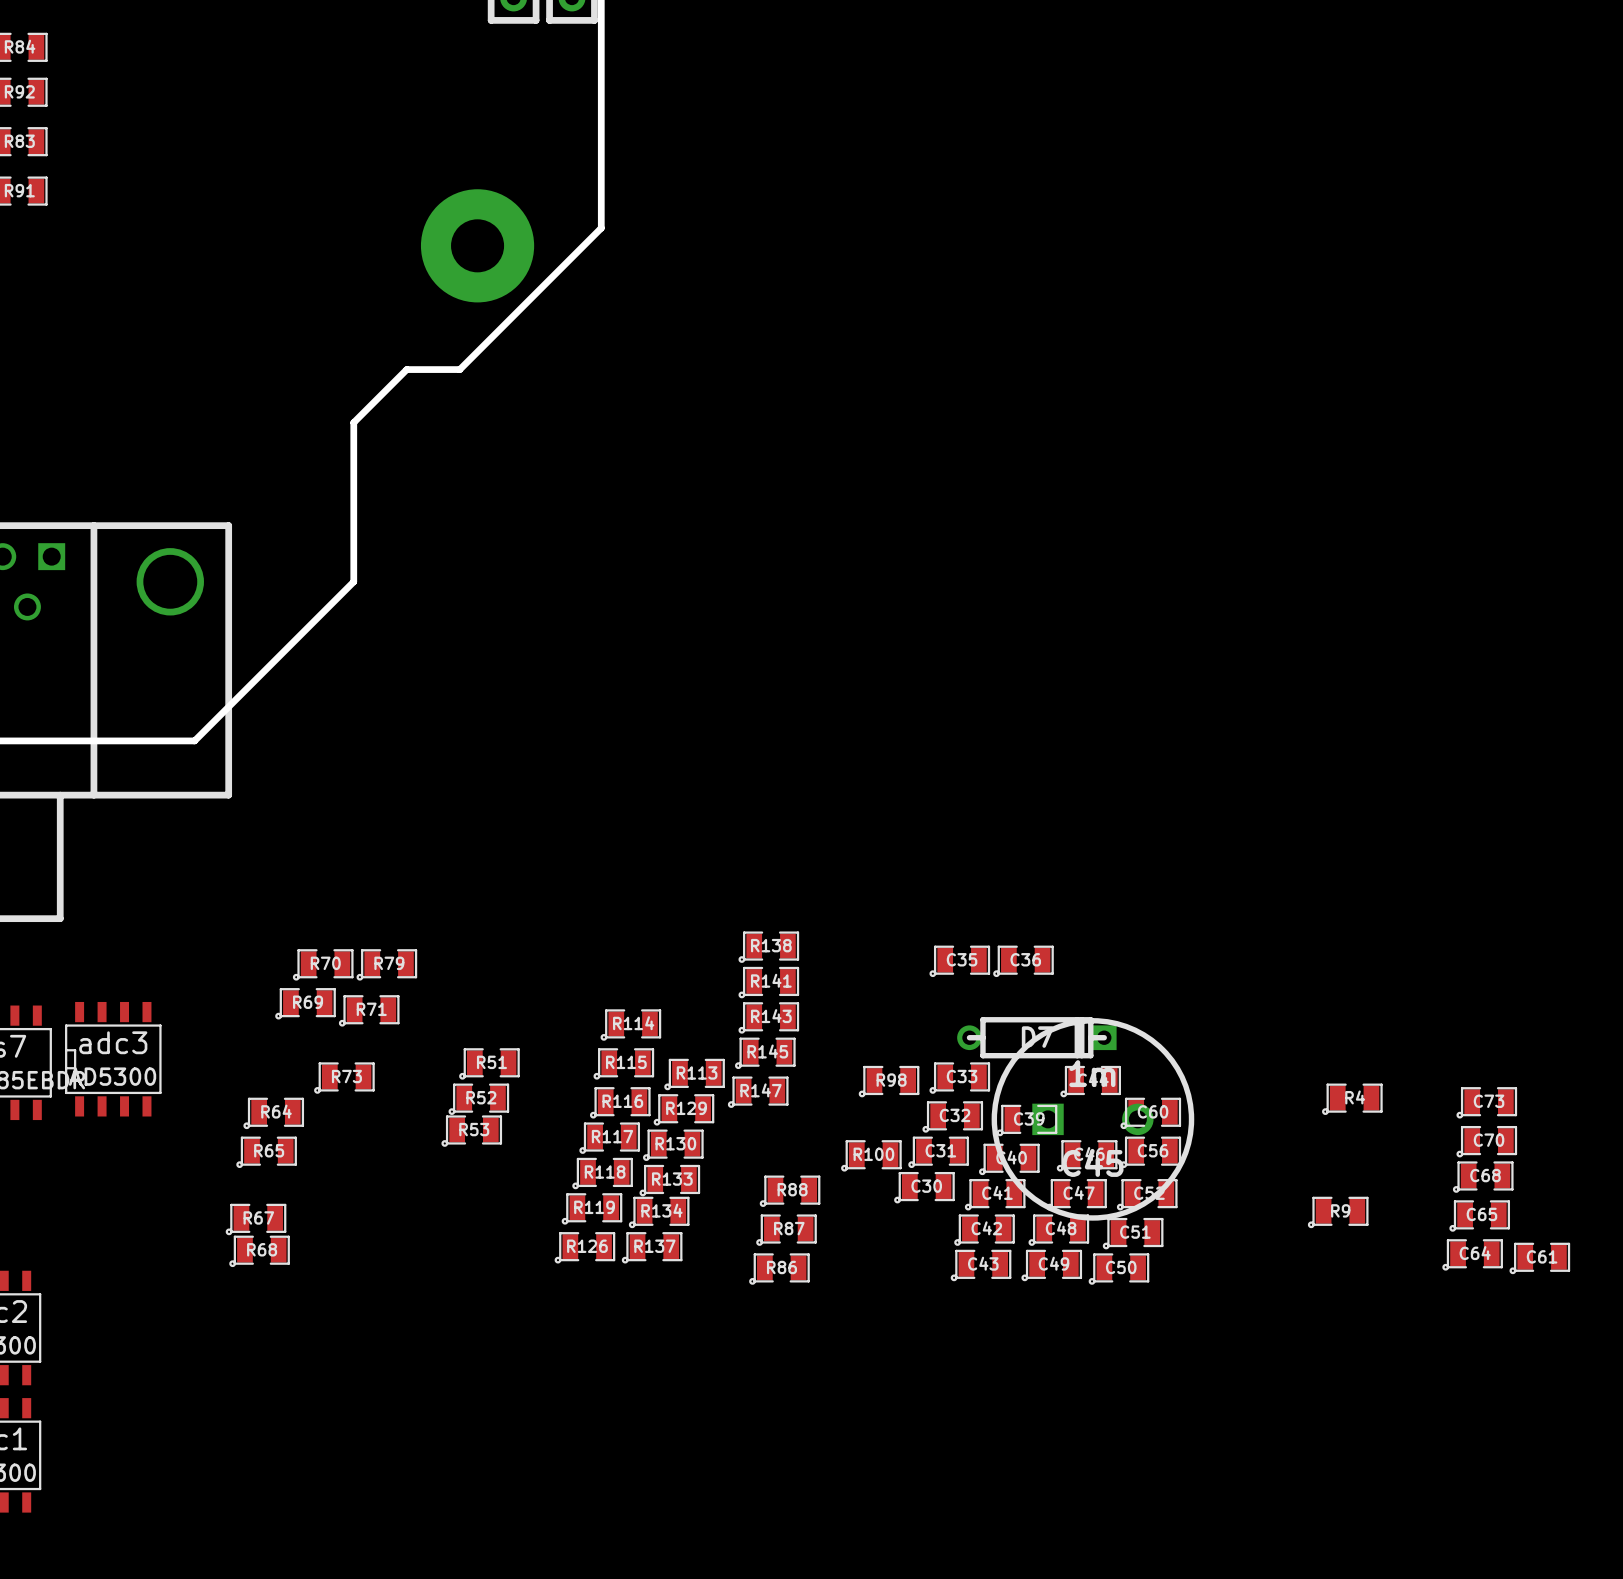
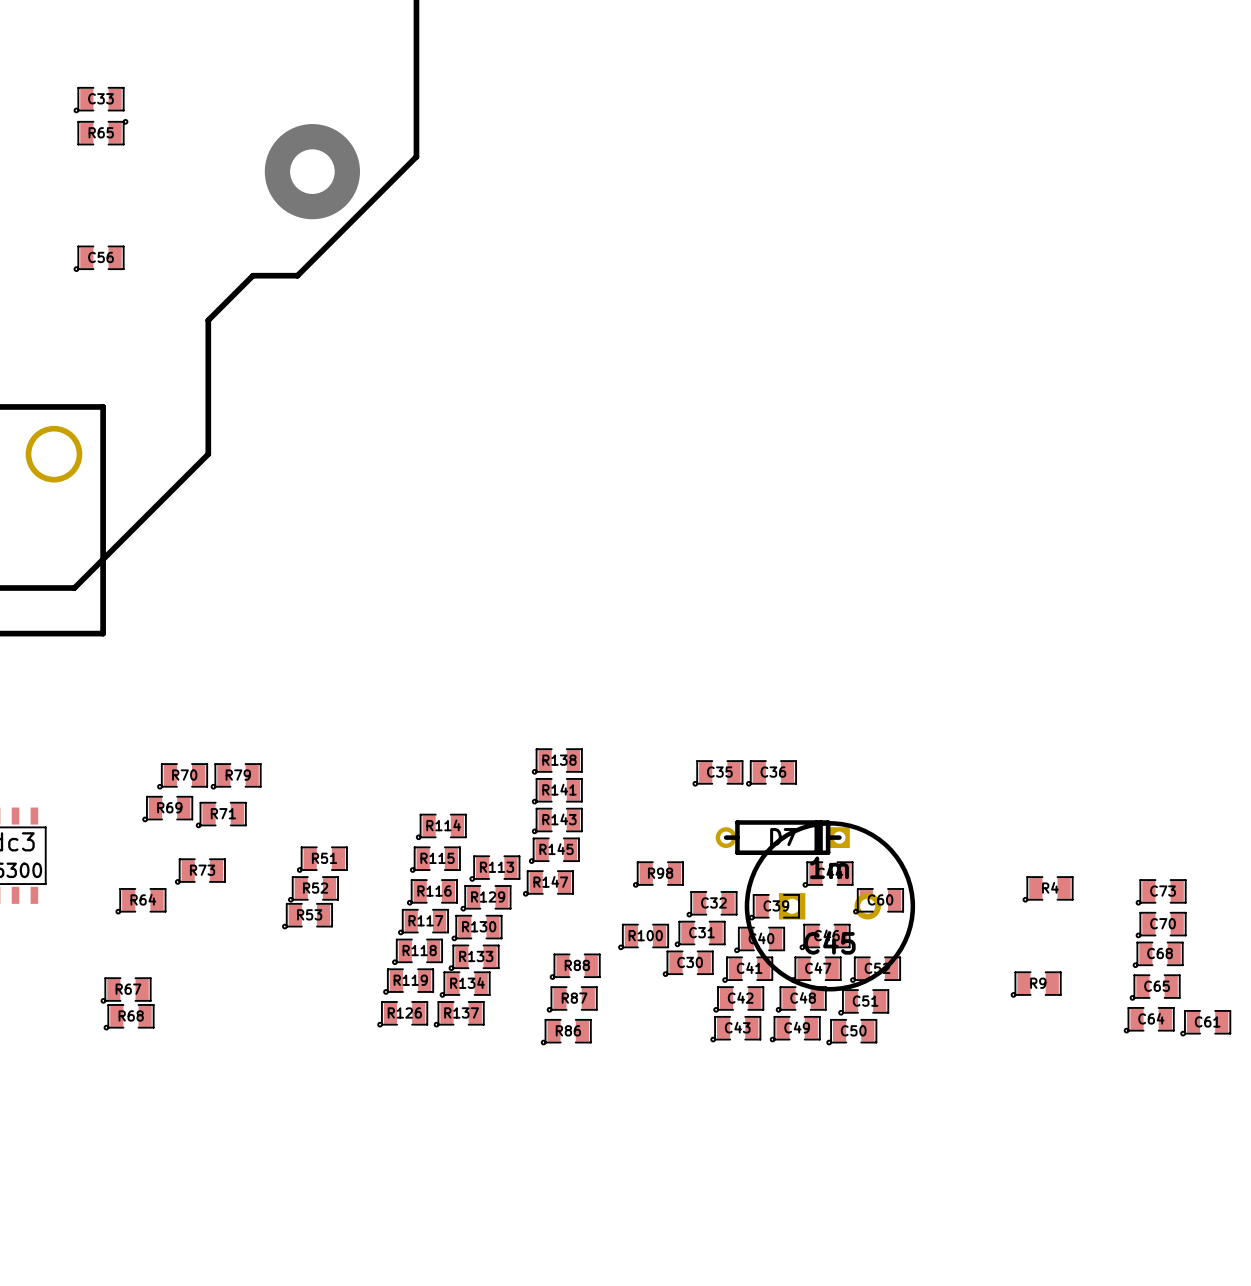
C33 position: (959, 1078) -> (99, 100)
R65 rotation: 0° (266, 1152) -> 180° (102, 132)
R65 position: (266, 1152) -> (102, 132)
C56 position: (1150, 1152) -> (99, 258)

